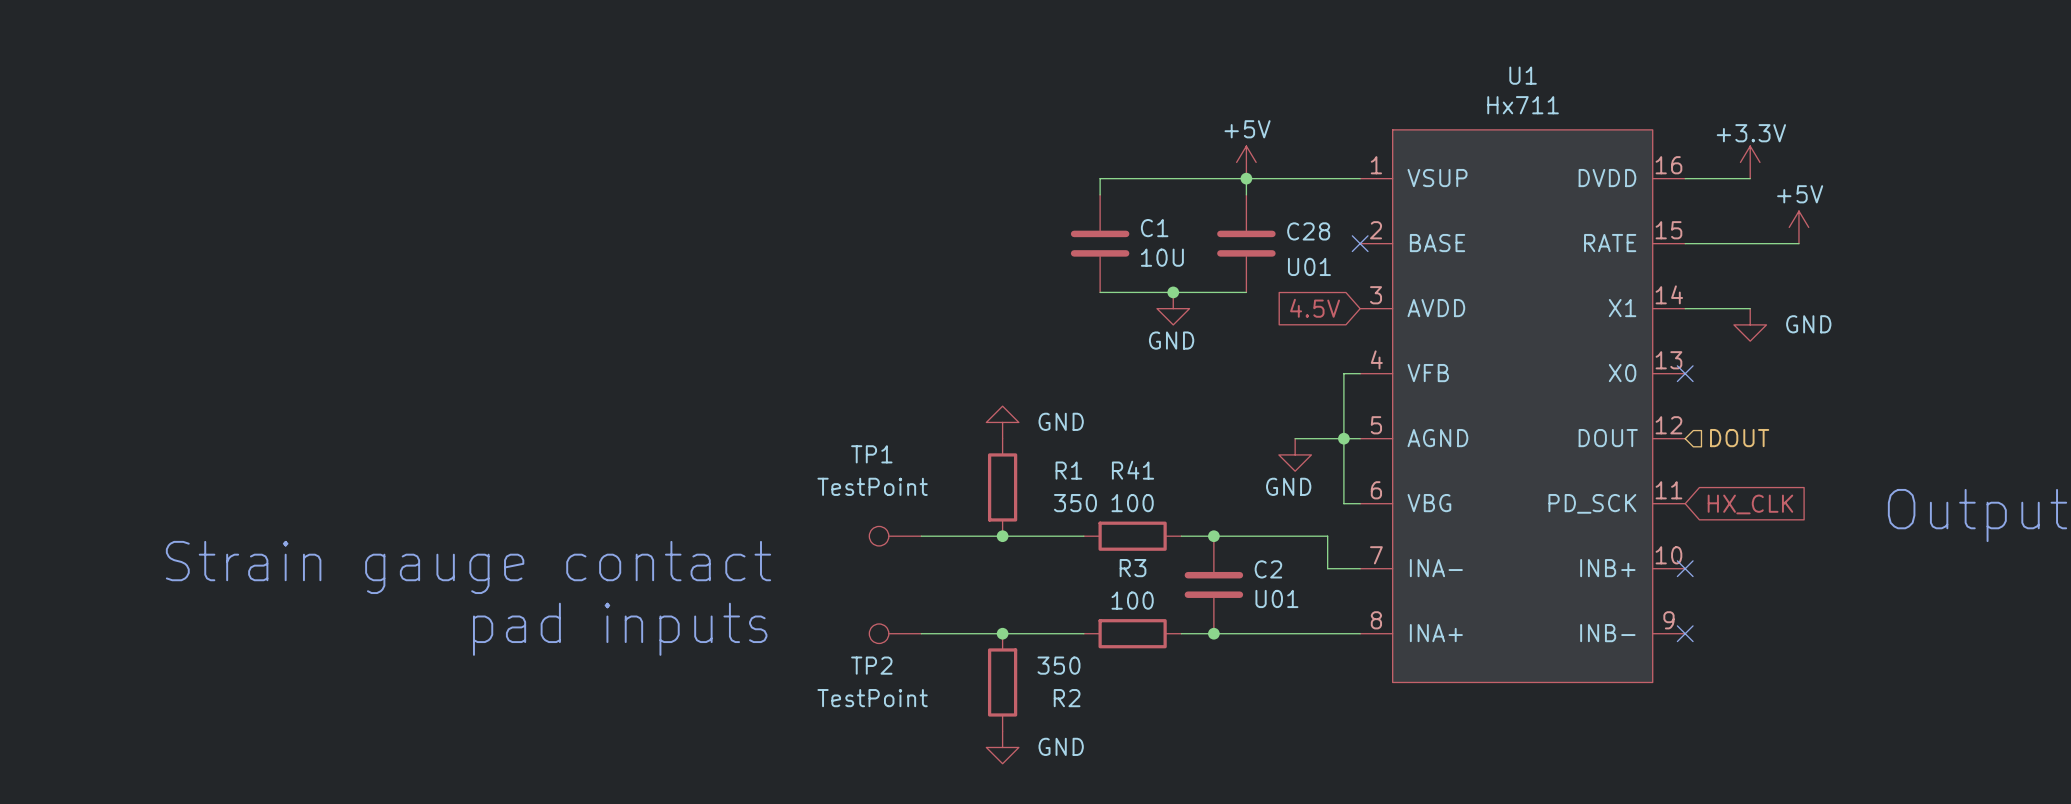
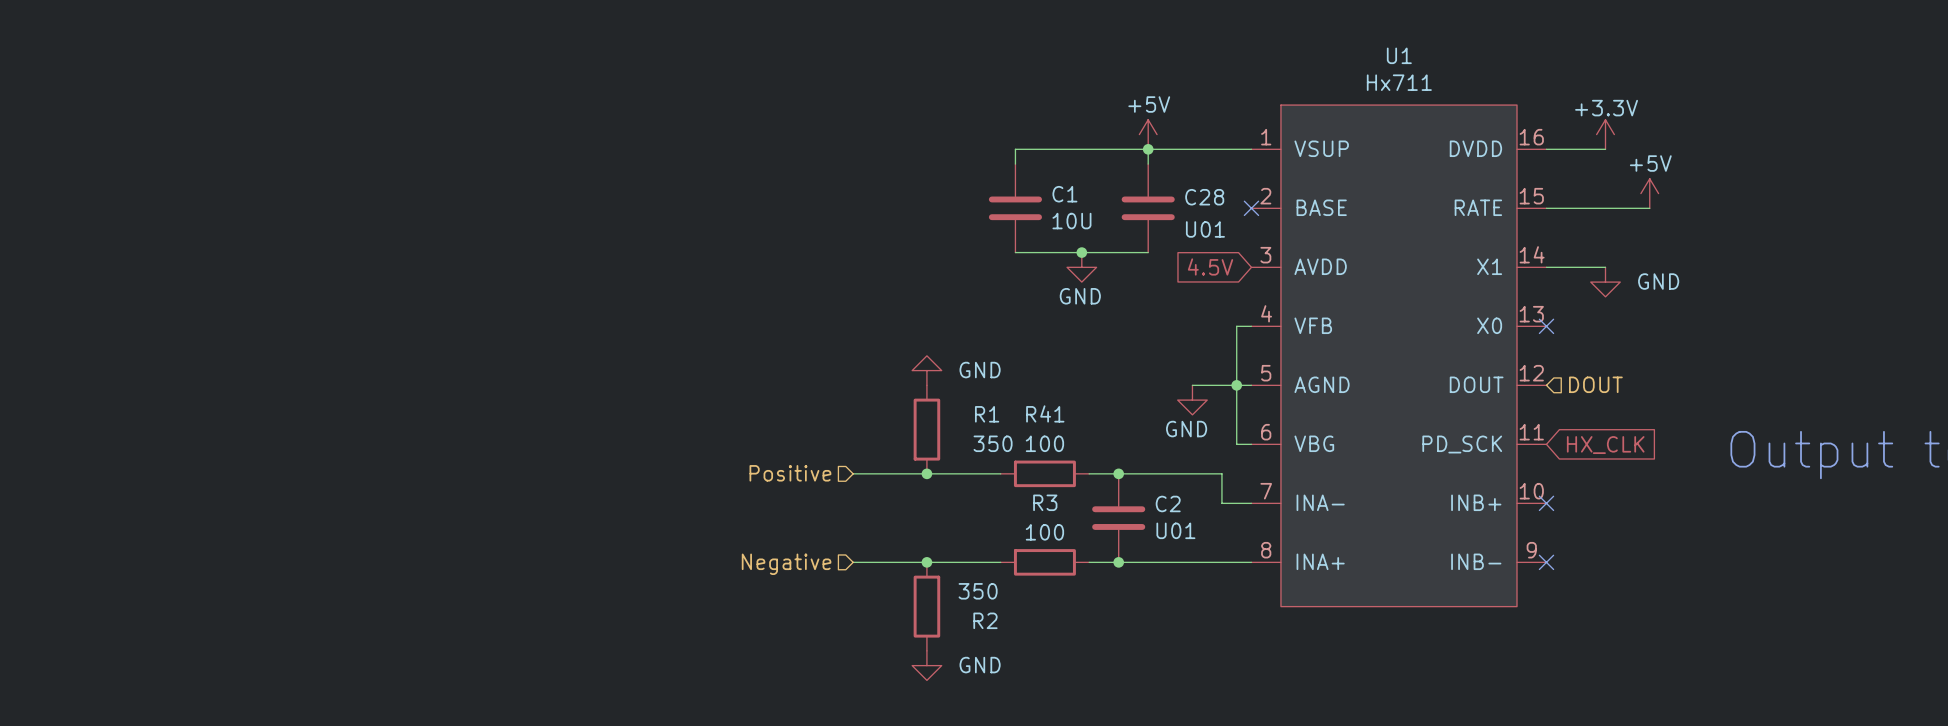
hierarchical label: none -> Positive (790, 473)
TP1: TestPoint (895, 536) -> none
text: Strain gauge contact (468, 567) -> none
text: pad inputs (620, 629) -> none
TP2: TestPoint (895, 633) -> none
hierarchical label: none -> Negative (786, 564)

